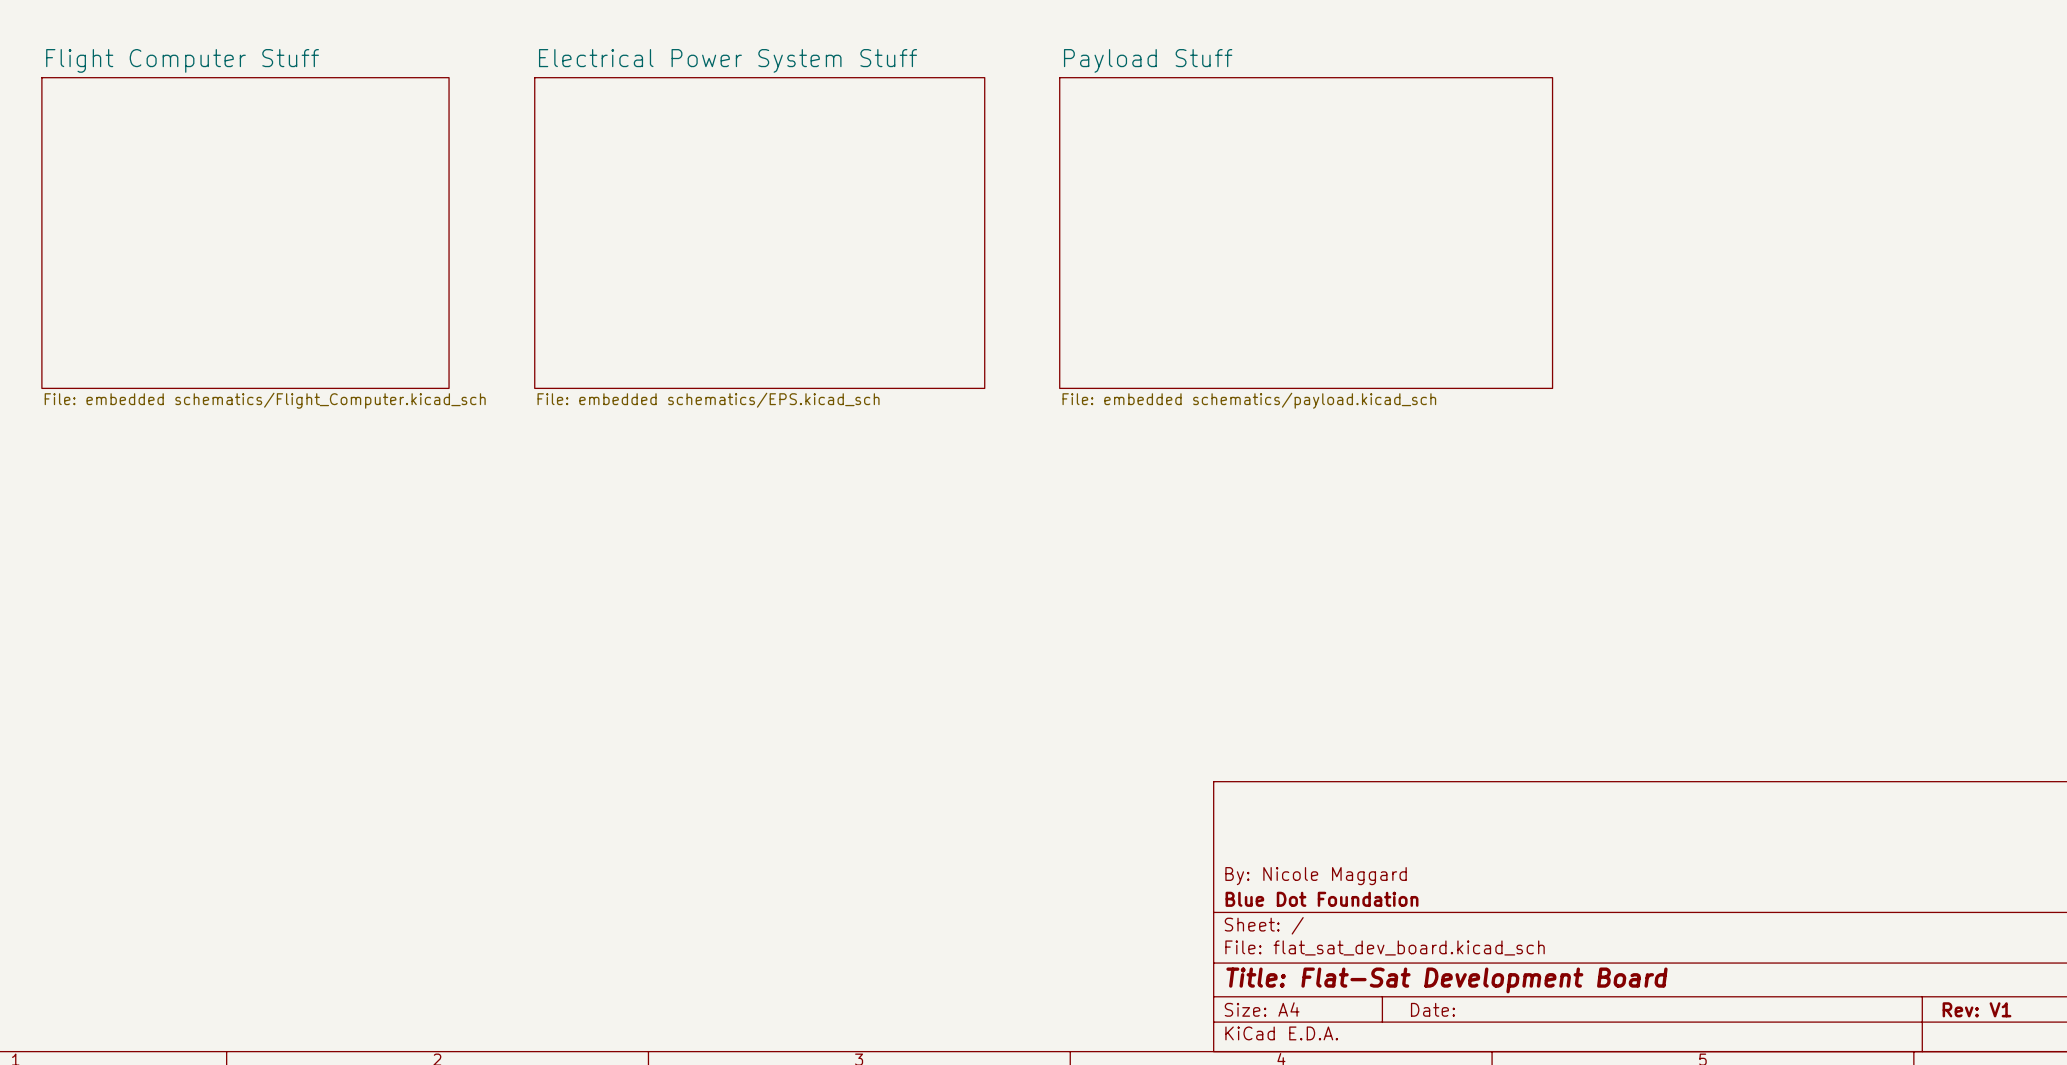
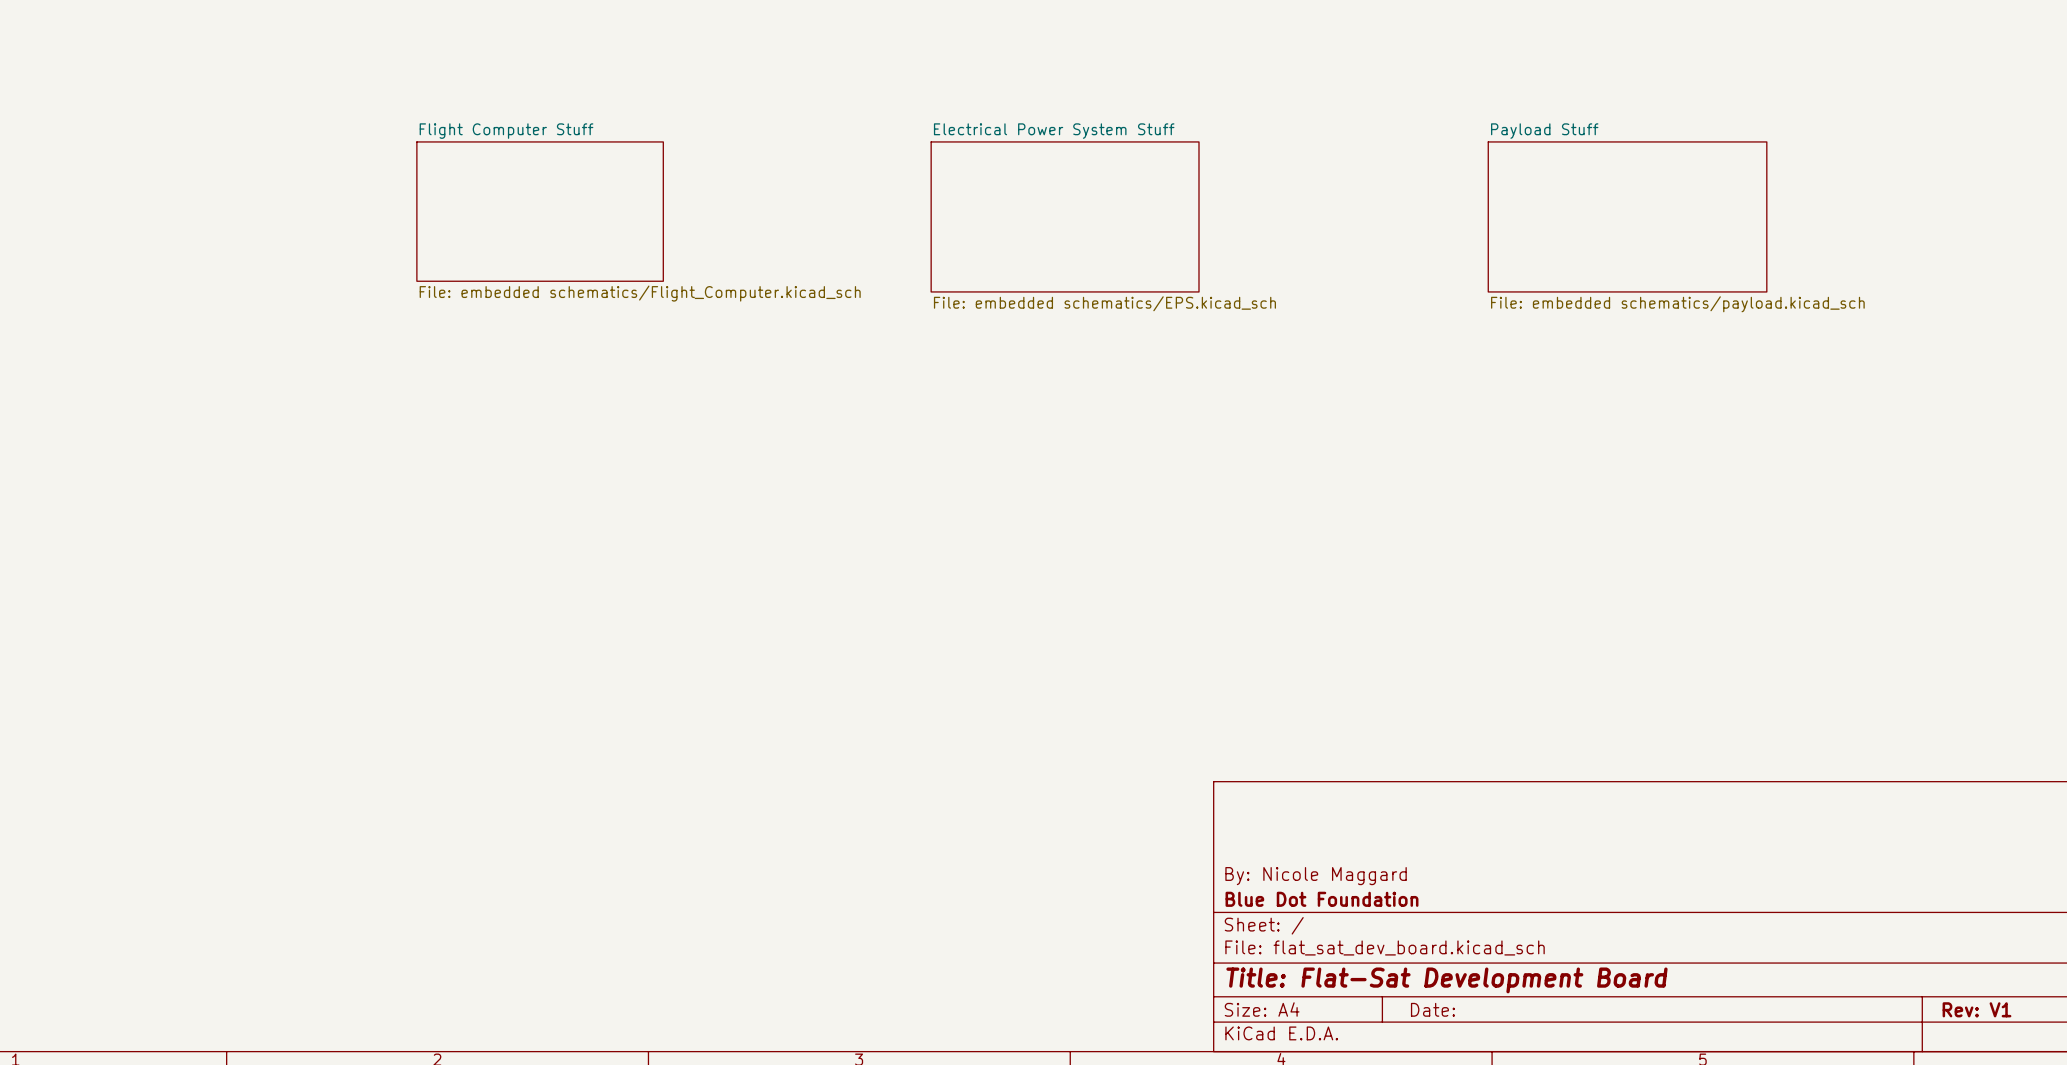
sheet Flight Computer Stuff: none -> File: embedded schematics/Flight_Computer.kicad_sch (540, 211)
sheet Electrical Power System Stuff: none -> File: embedded schematics/EPS.kicad_sch (1065, 216)
sheet Payload Stuff: none -> File: embedded schematics/payload.kicad_sch (1627, 216)
sheet Flight Computer Stuff: File: embedded schematics/Flight_Computer.kicad_sch (245, 233) -> none
sheet Electrical Power System Stuff: File: embedded schematics/EPS.kicad_sch (759, 233) -> none
sheet Payload Stuff: File: embedded schematics/payload.kicad_sch (1306, 233) -> none

